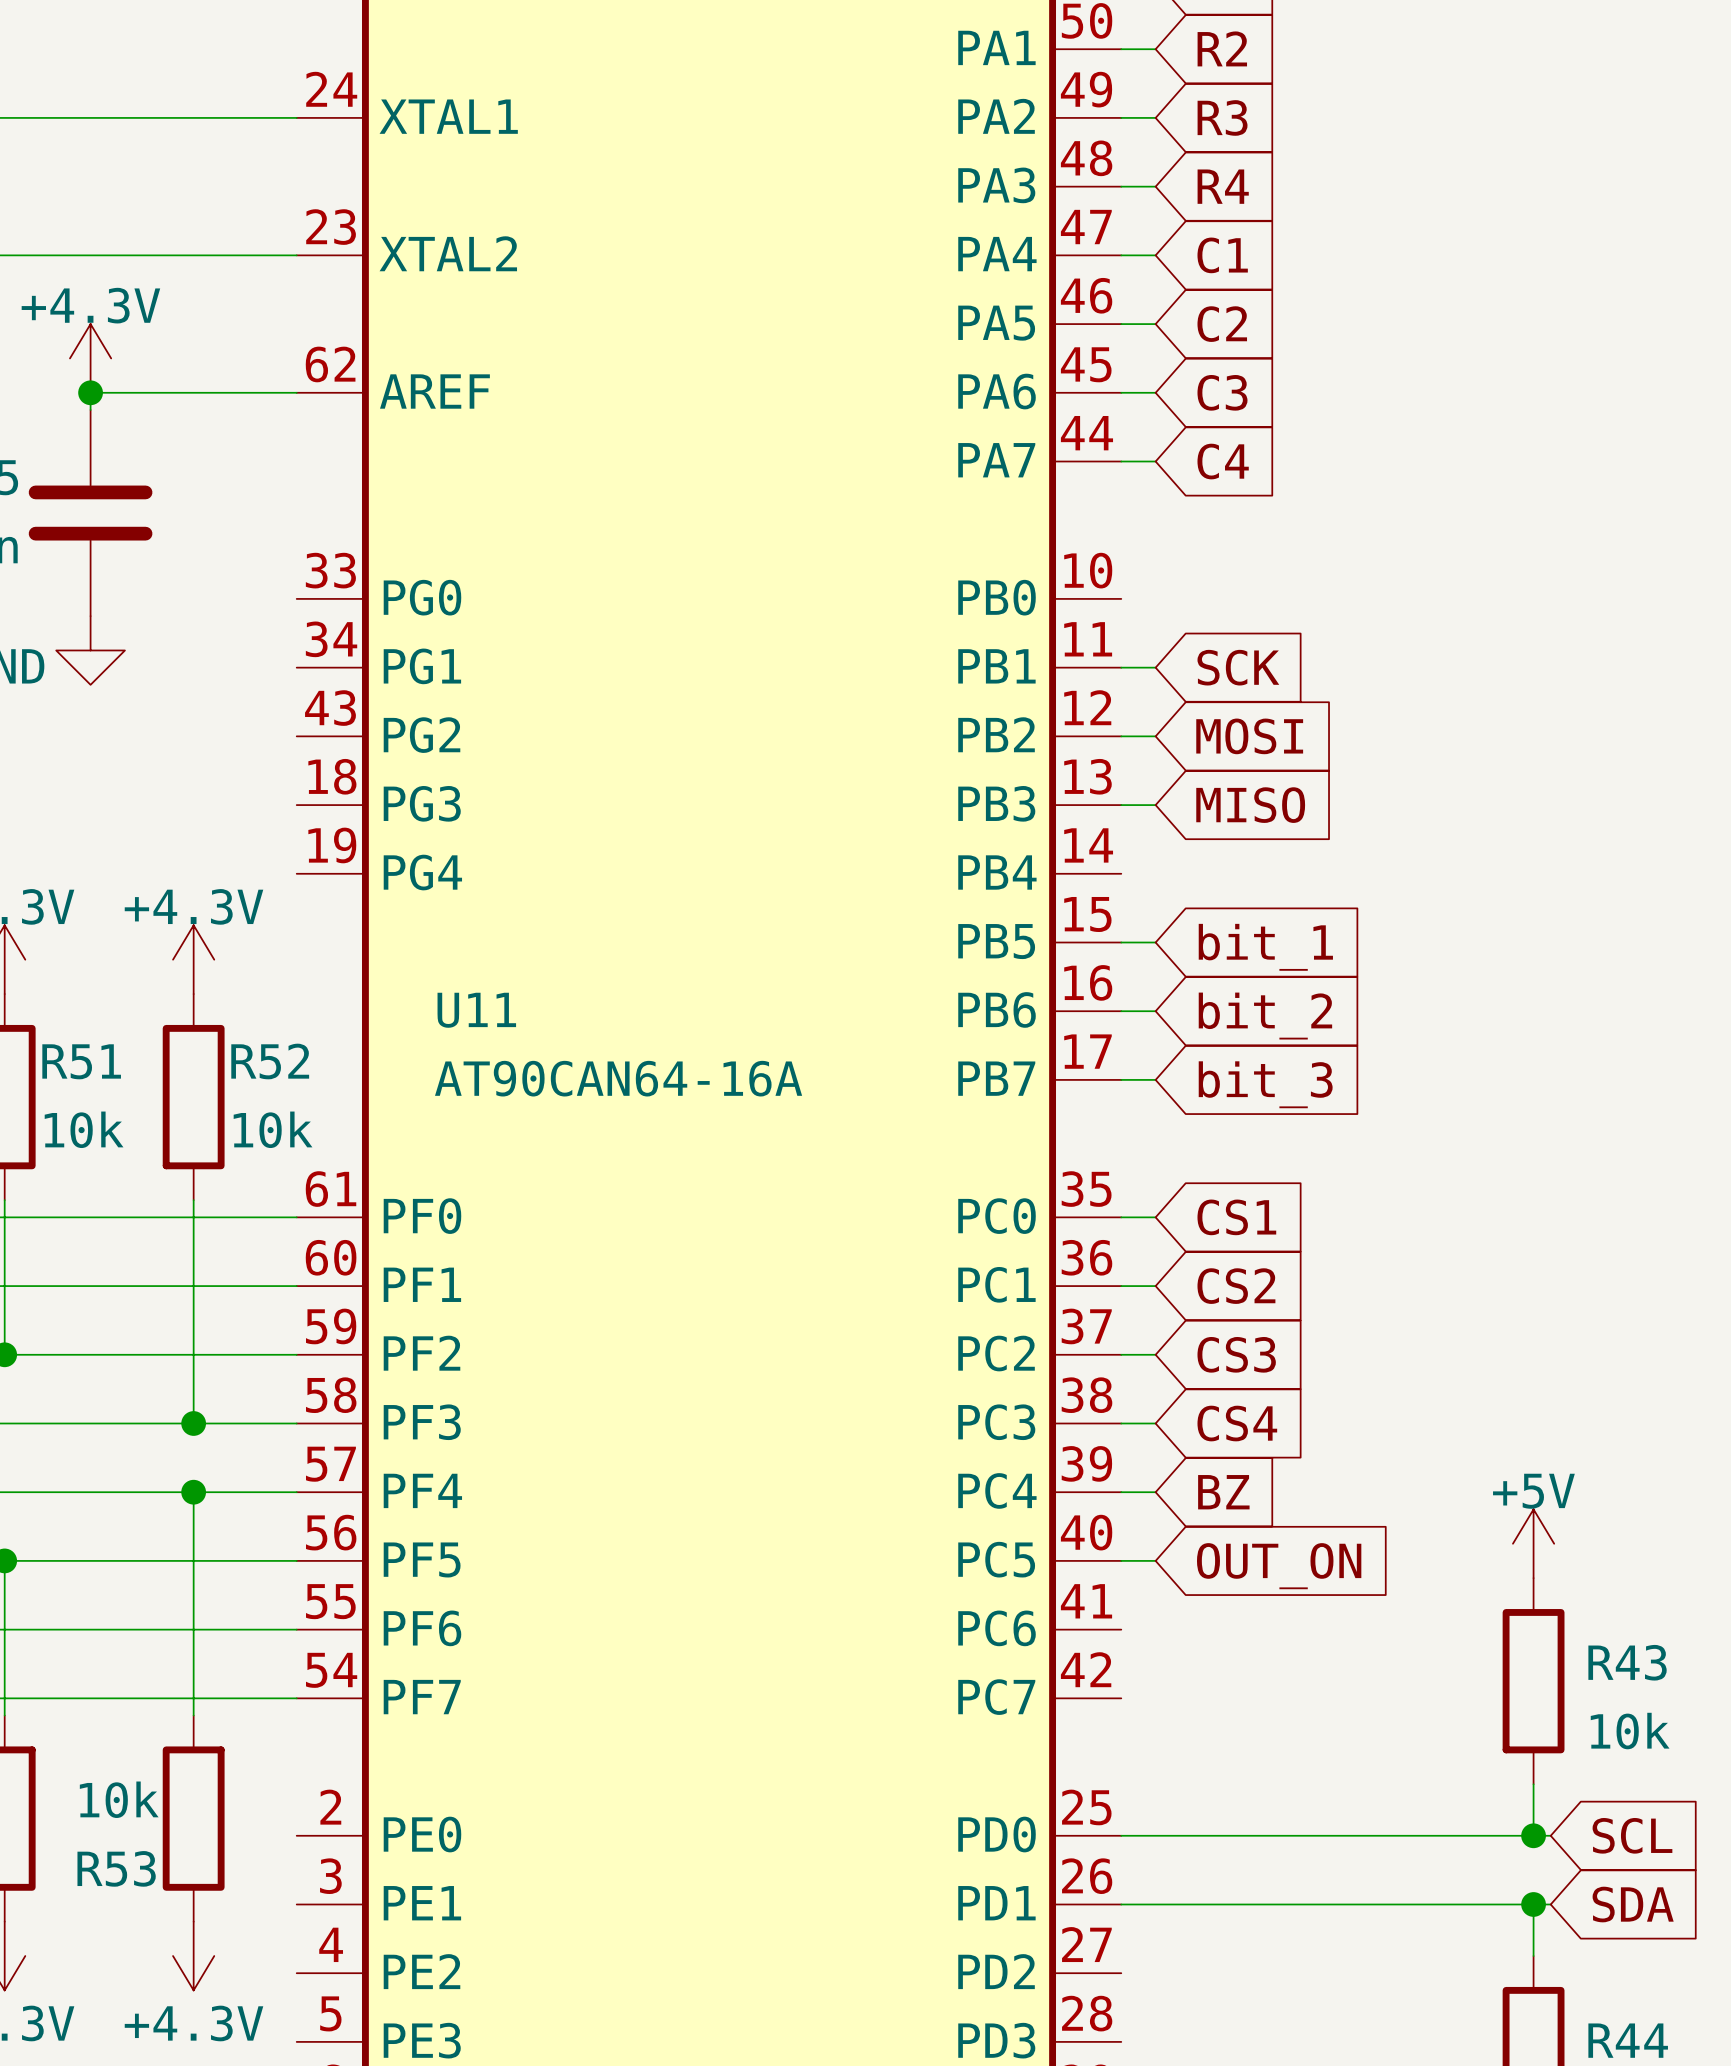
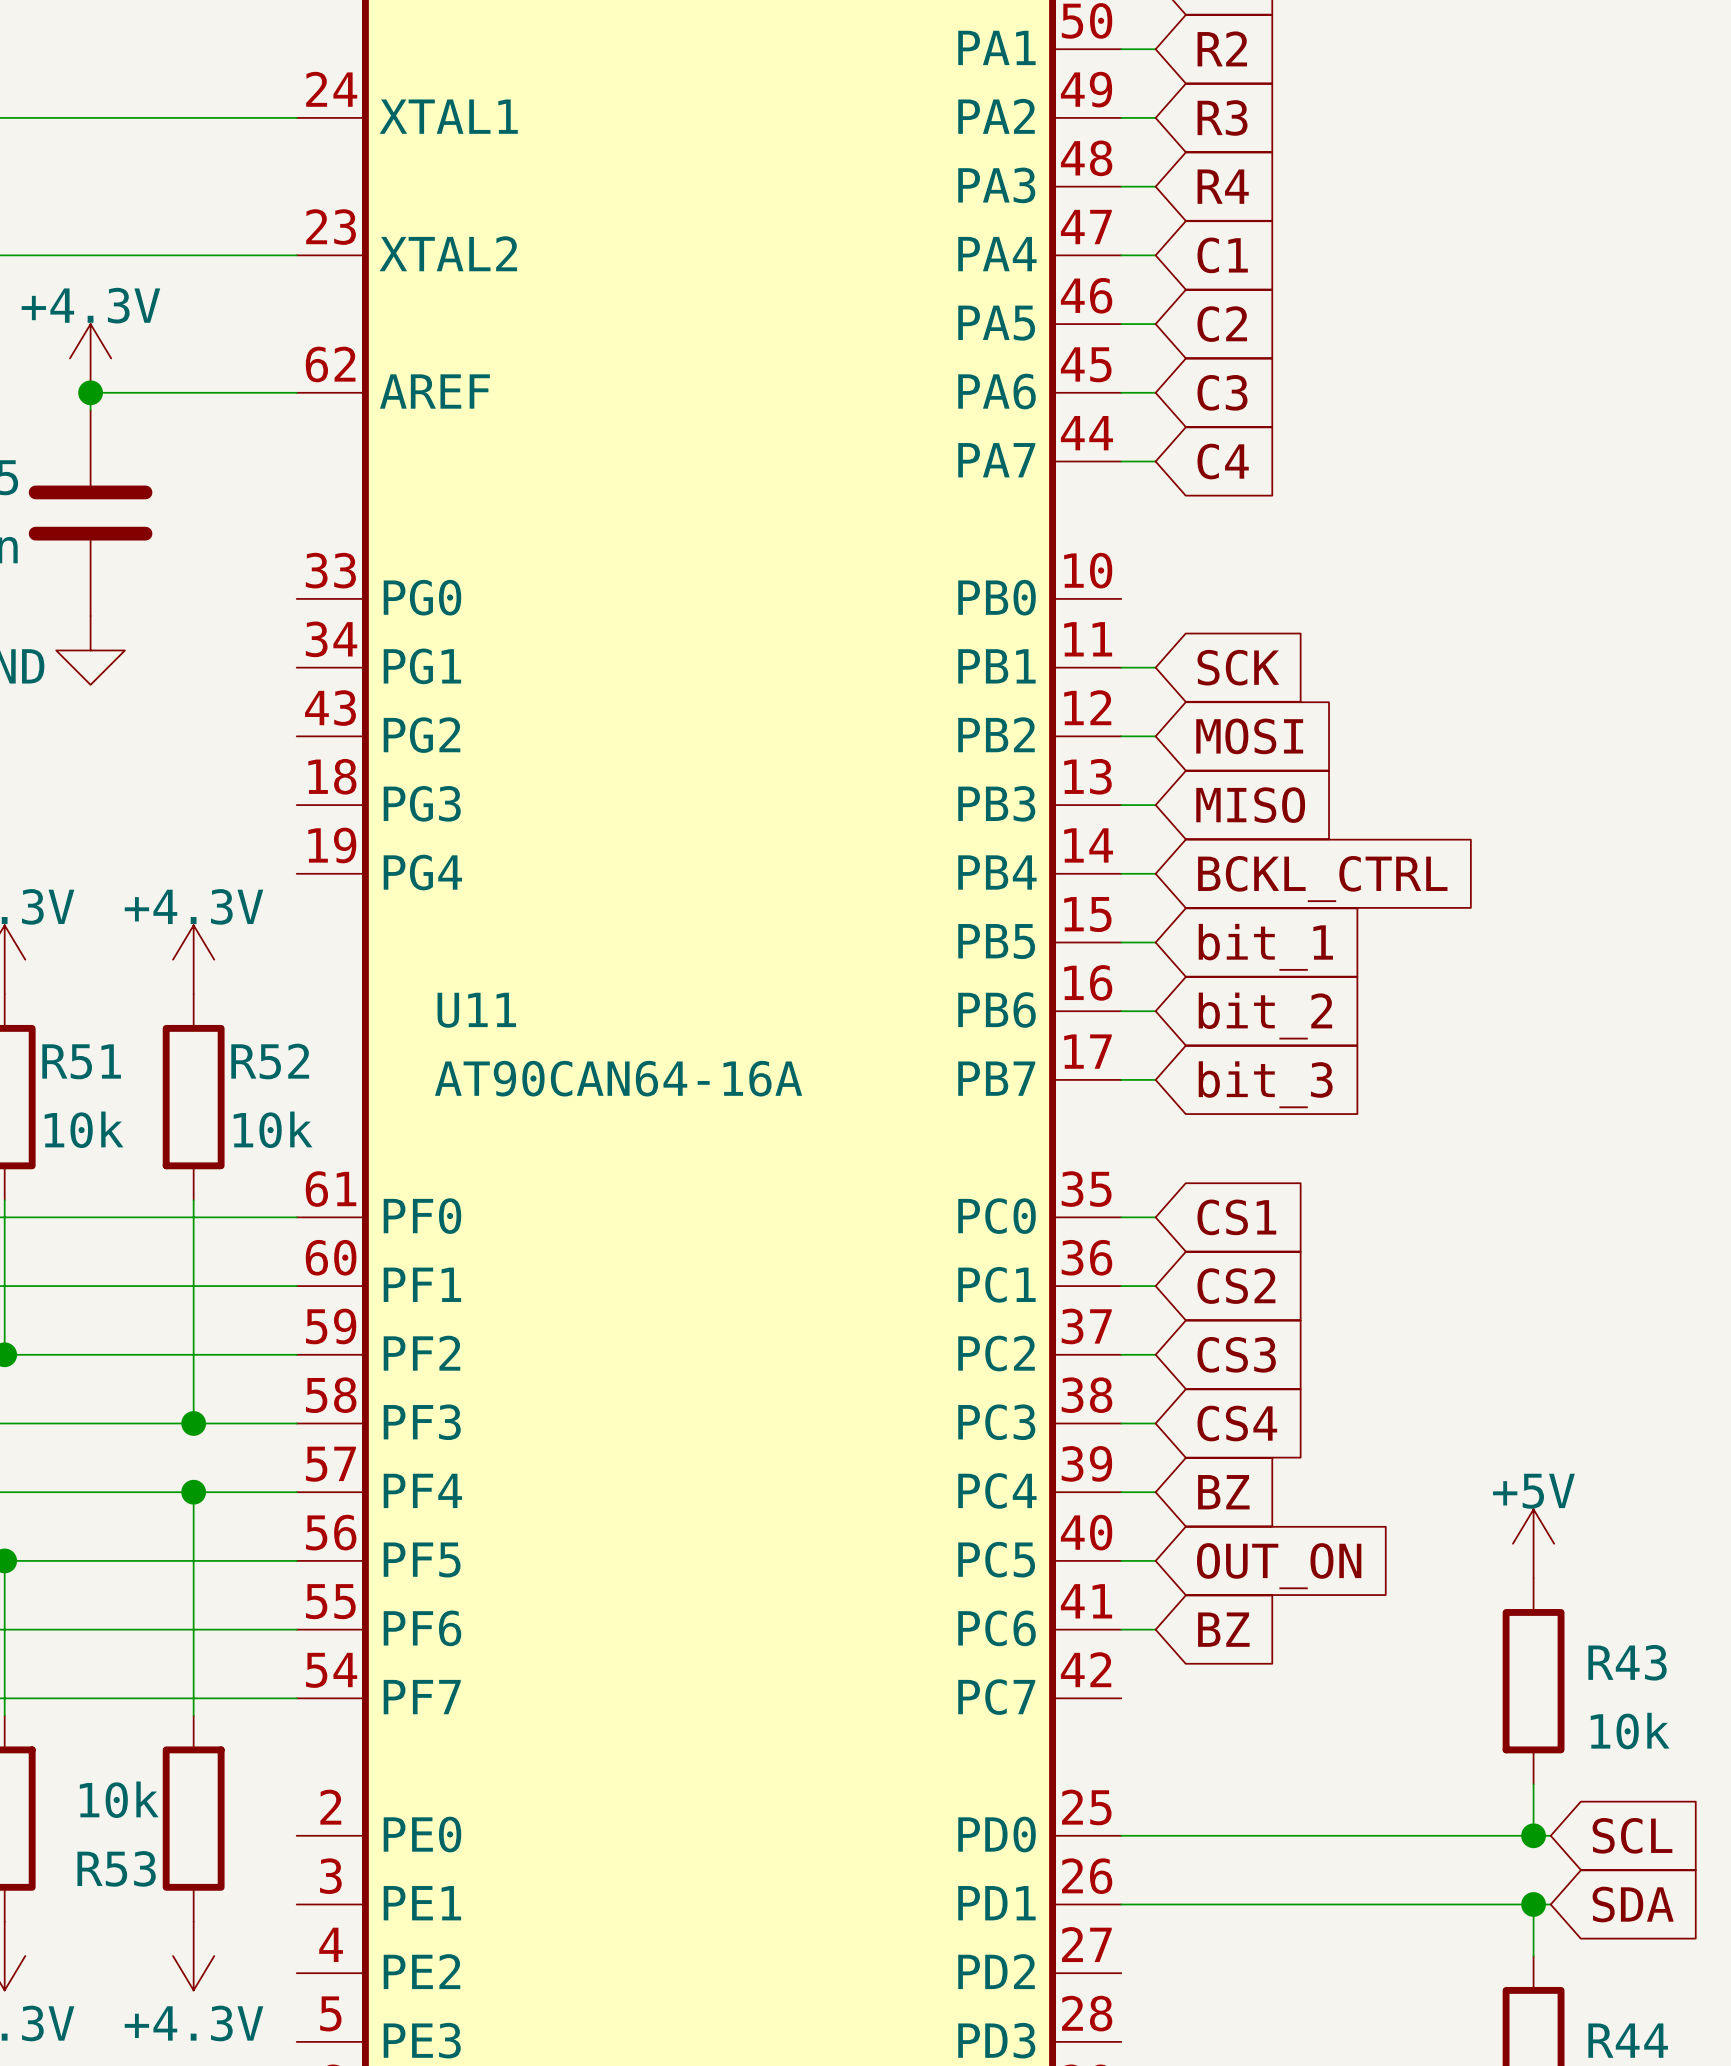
wire: none -> (1121, 873) (1155, 873)
global label: none -> BCKL_CTRL (1322, 879)
wire: none -> (1121, 1629) (1155, 1629)
global label: none -> BZ (1223, 1629)

